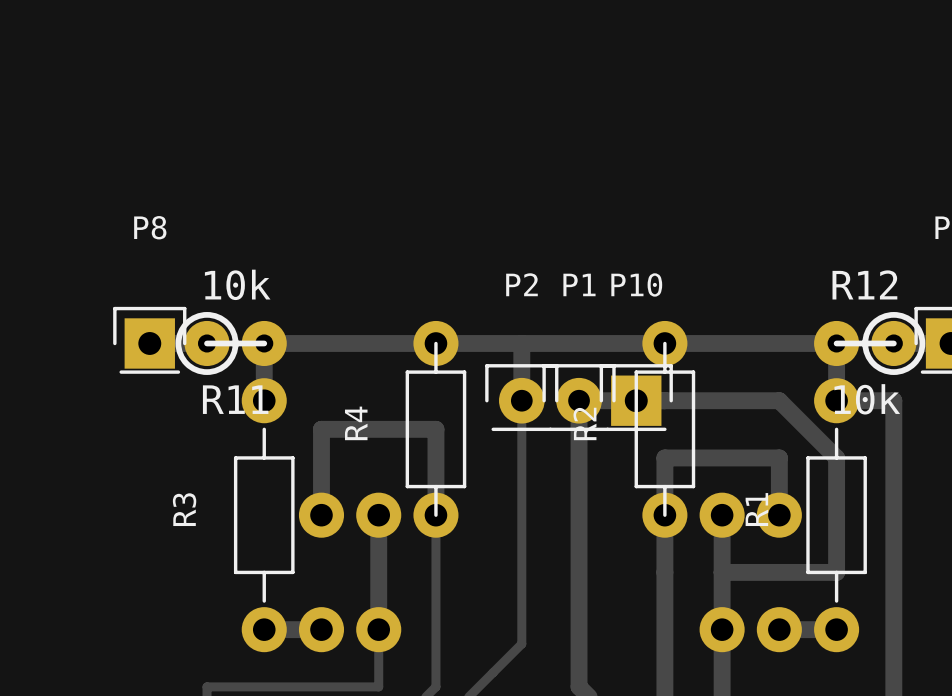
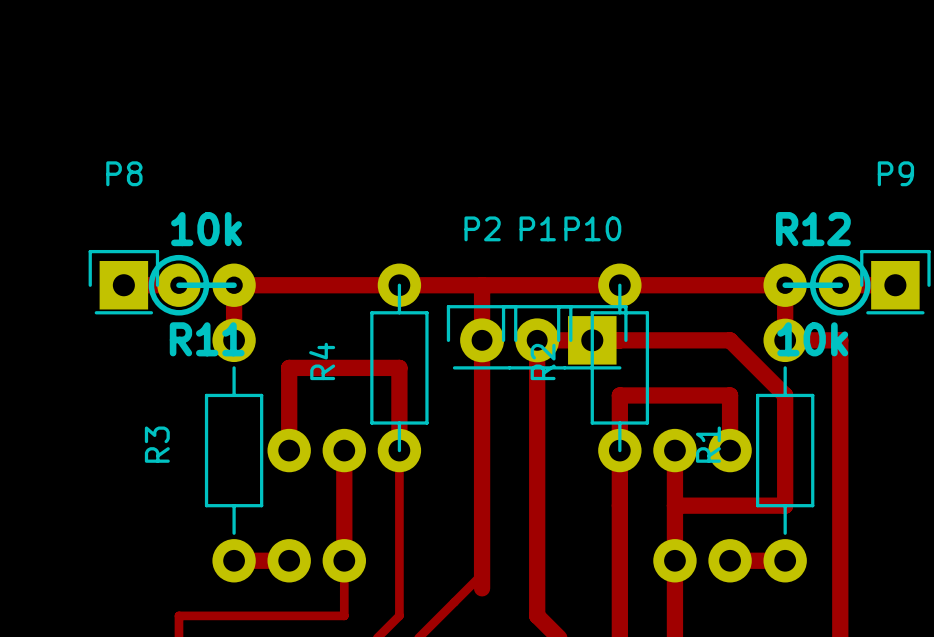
track: none -> (482, 340) (482, 588)

